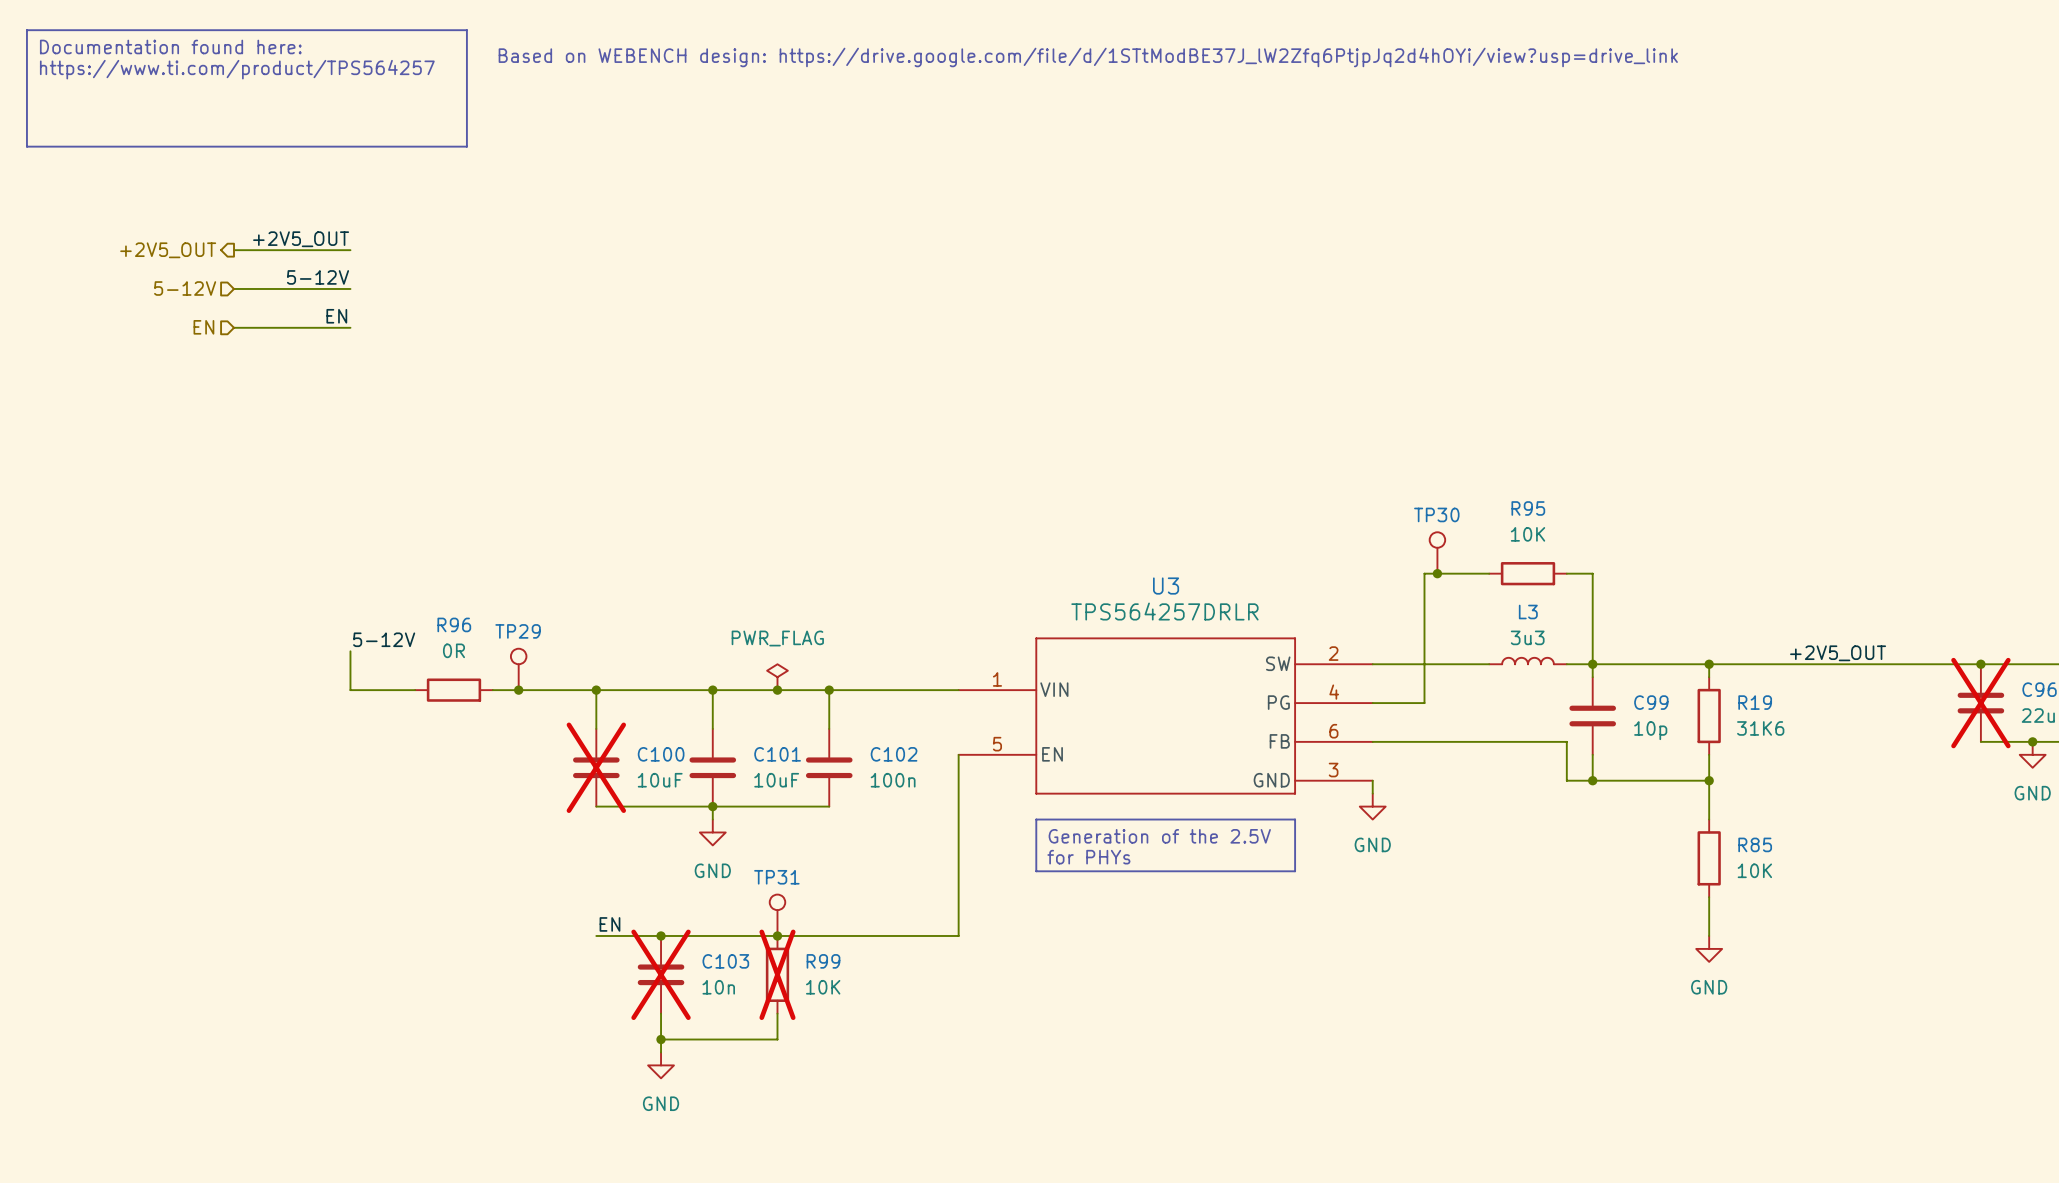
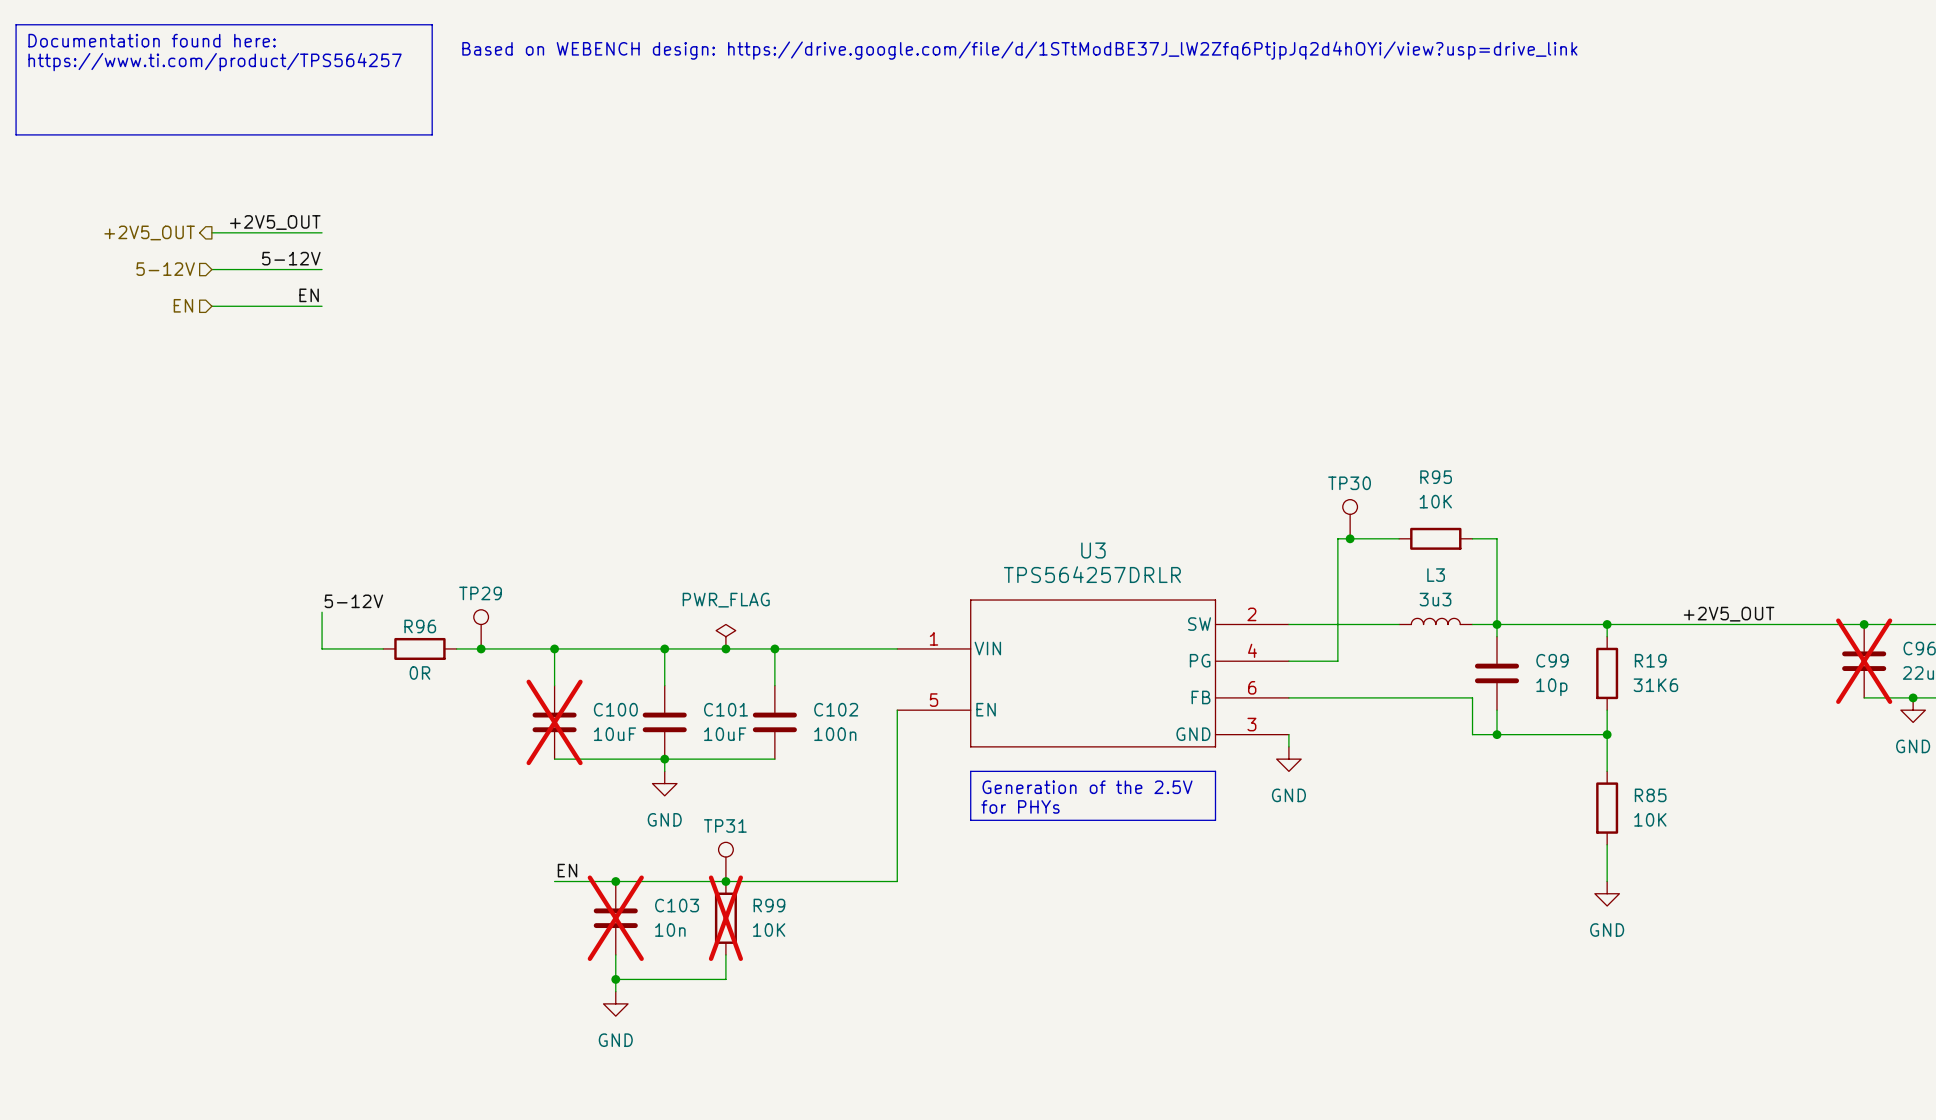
R96 name position: R96 (454, 624) -> R96 (420, 626)
R96 value position: 0R (453, 650) -> 0R (419, 672)

